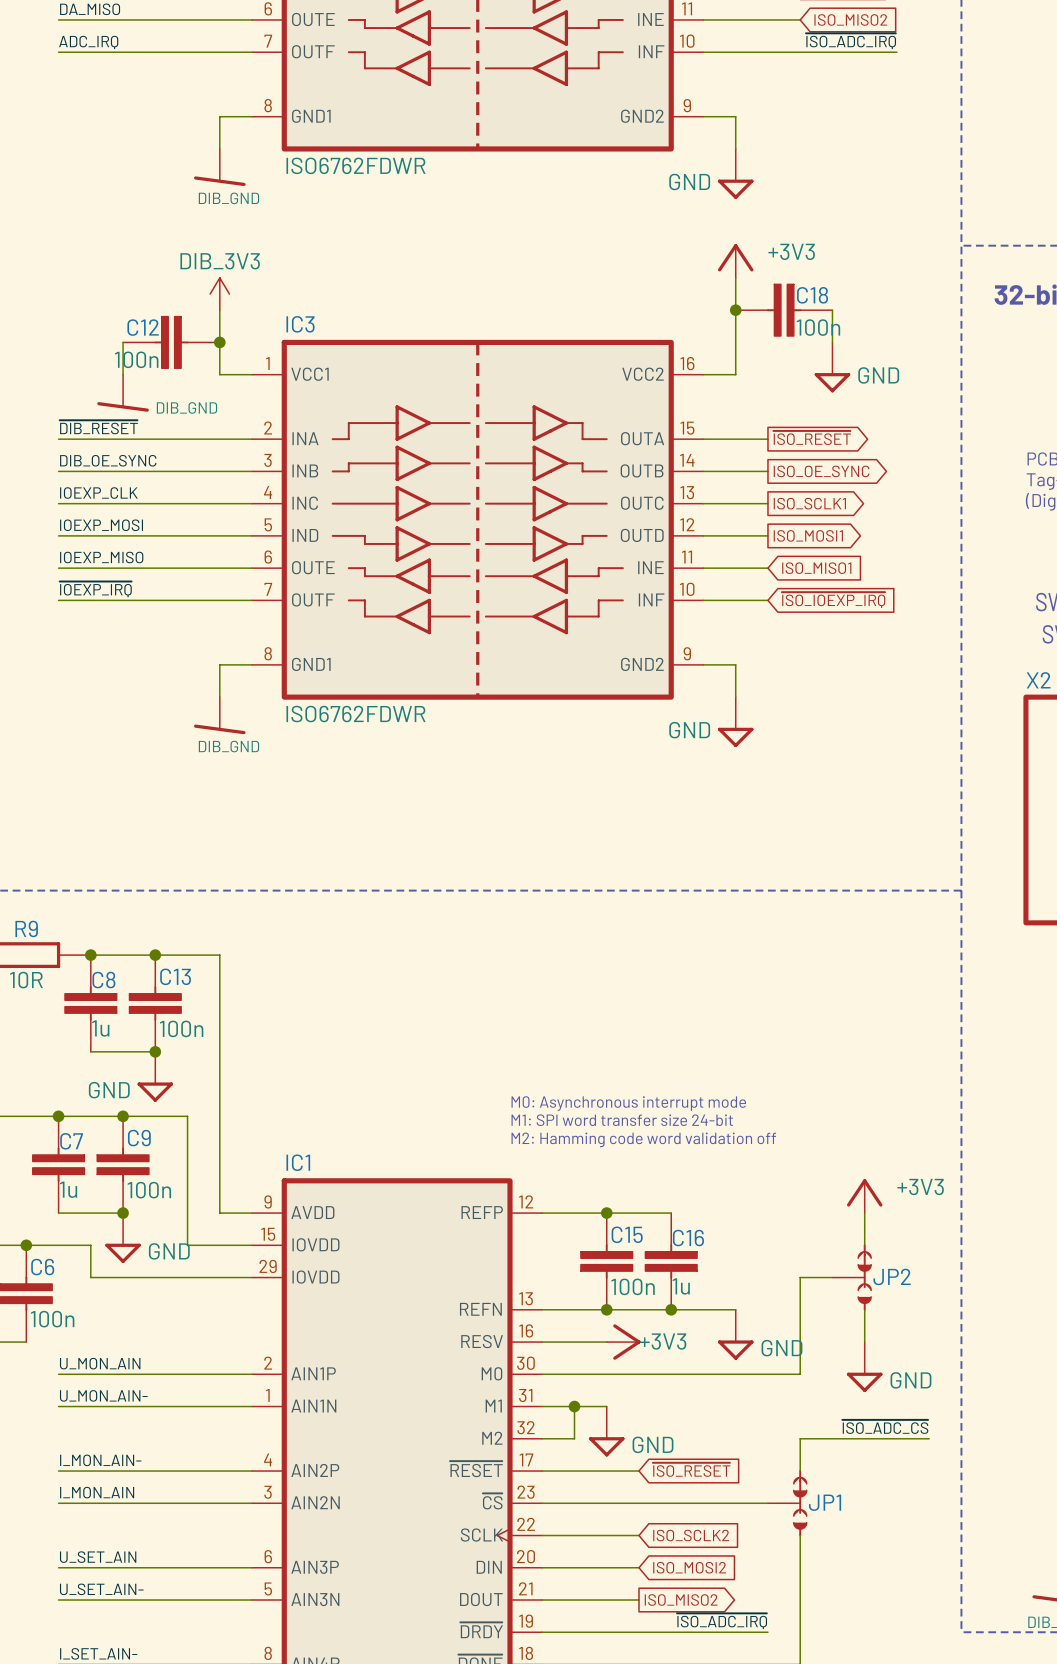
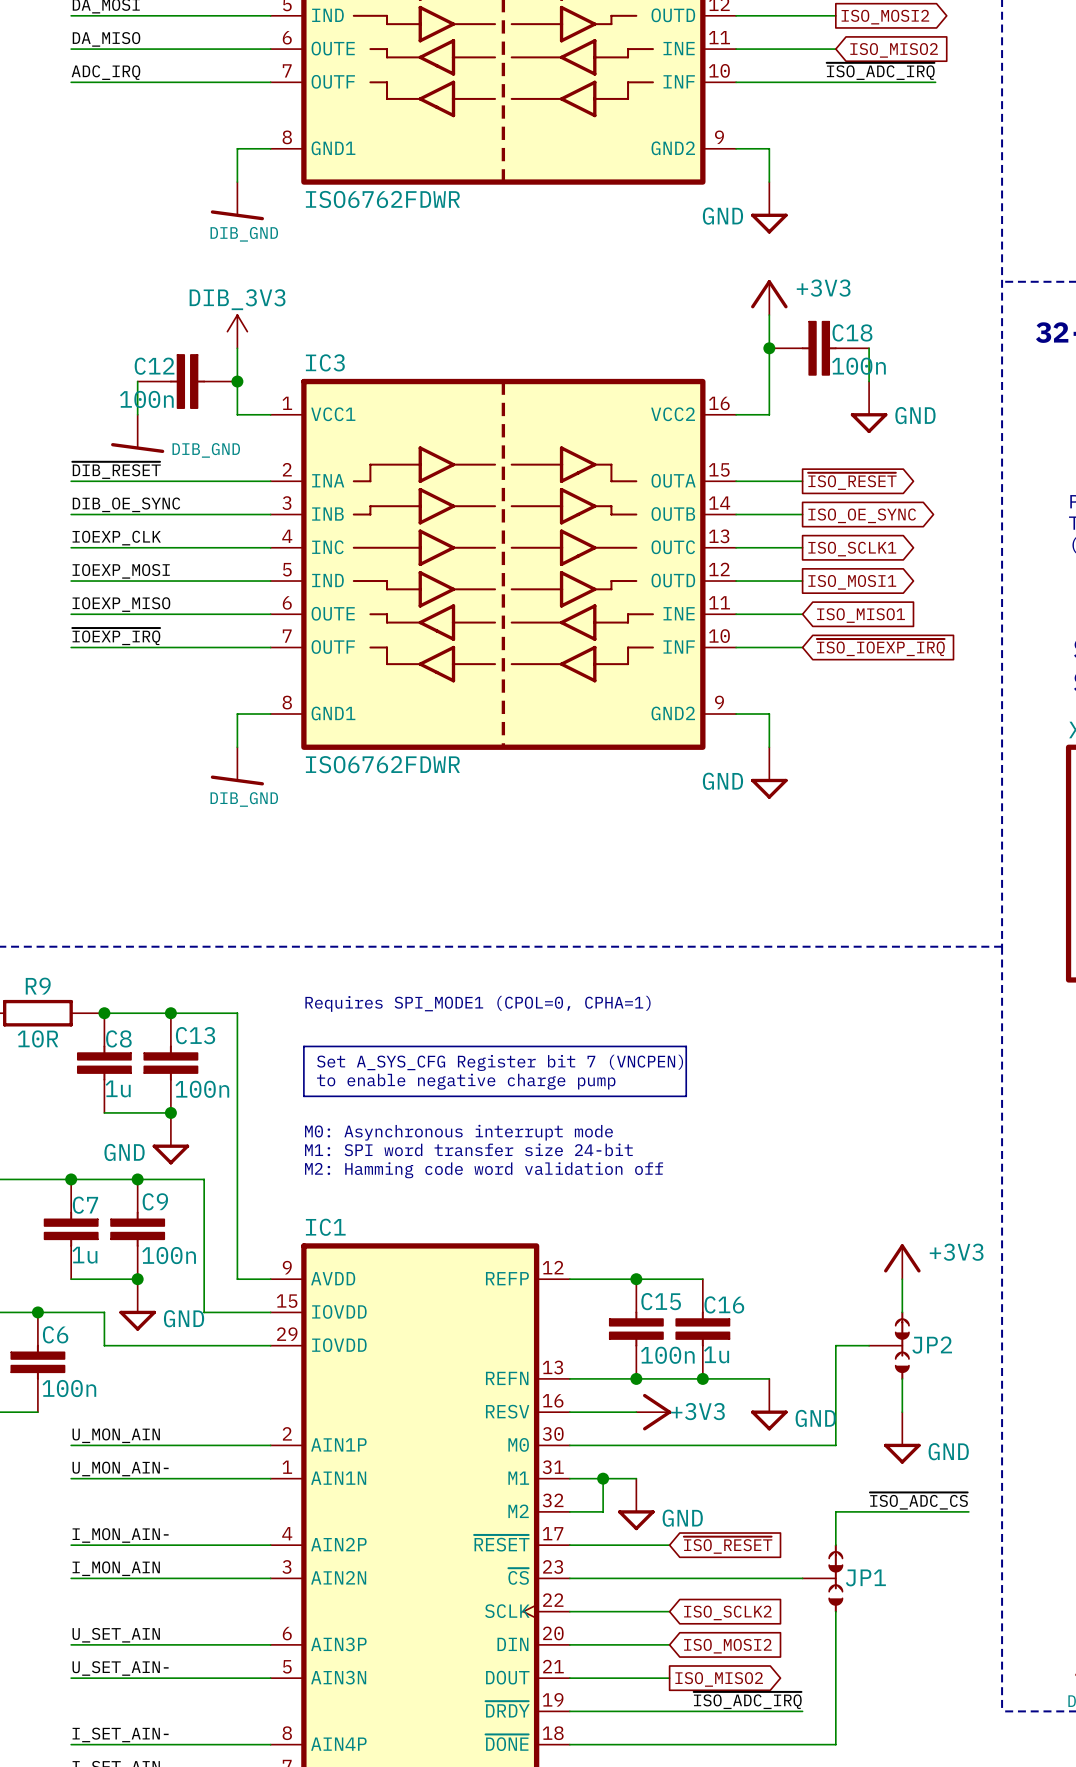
text: none -> Requires SPI_MODE1 (CPOL=0, CPHA=1) (477, 1003)
line: none -> (303, 1046) (686, 1046) (686, 1096) (303, 1096) (303, 1046)
text: none -> Set A_SYS_CFG Register bit 7 (VNCPEN) (500, 1062)
text: none -> to enable negative charge pump (466, 1081)
text position: M0: Asynchronous interrupt mode (628, 1103) -> M0: Asynchronous interrupt mode (458, 1132)
text position: M1: SPI word transfer size 24-bit (622, 1120) -> M1: SPI word transfer size 24-bit (468, 1149)
text position: M2: Hamming code word validation off (643, 1139) -> M2: Hamming code word validation off (484, 1170)

